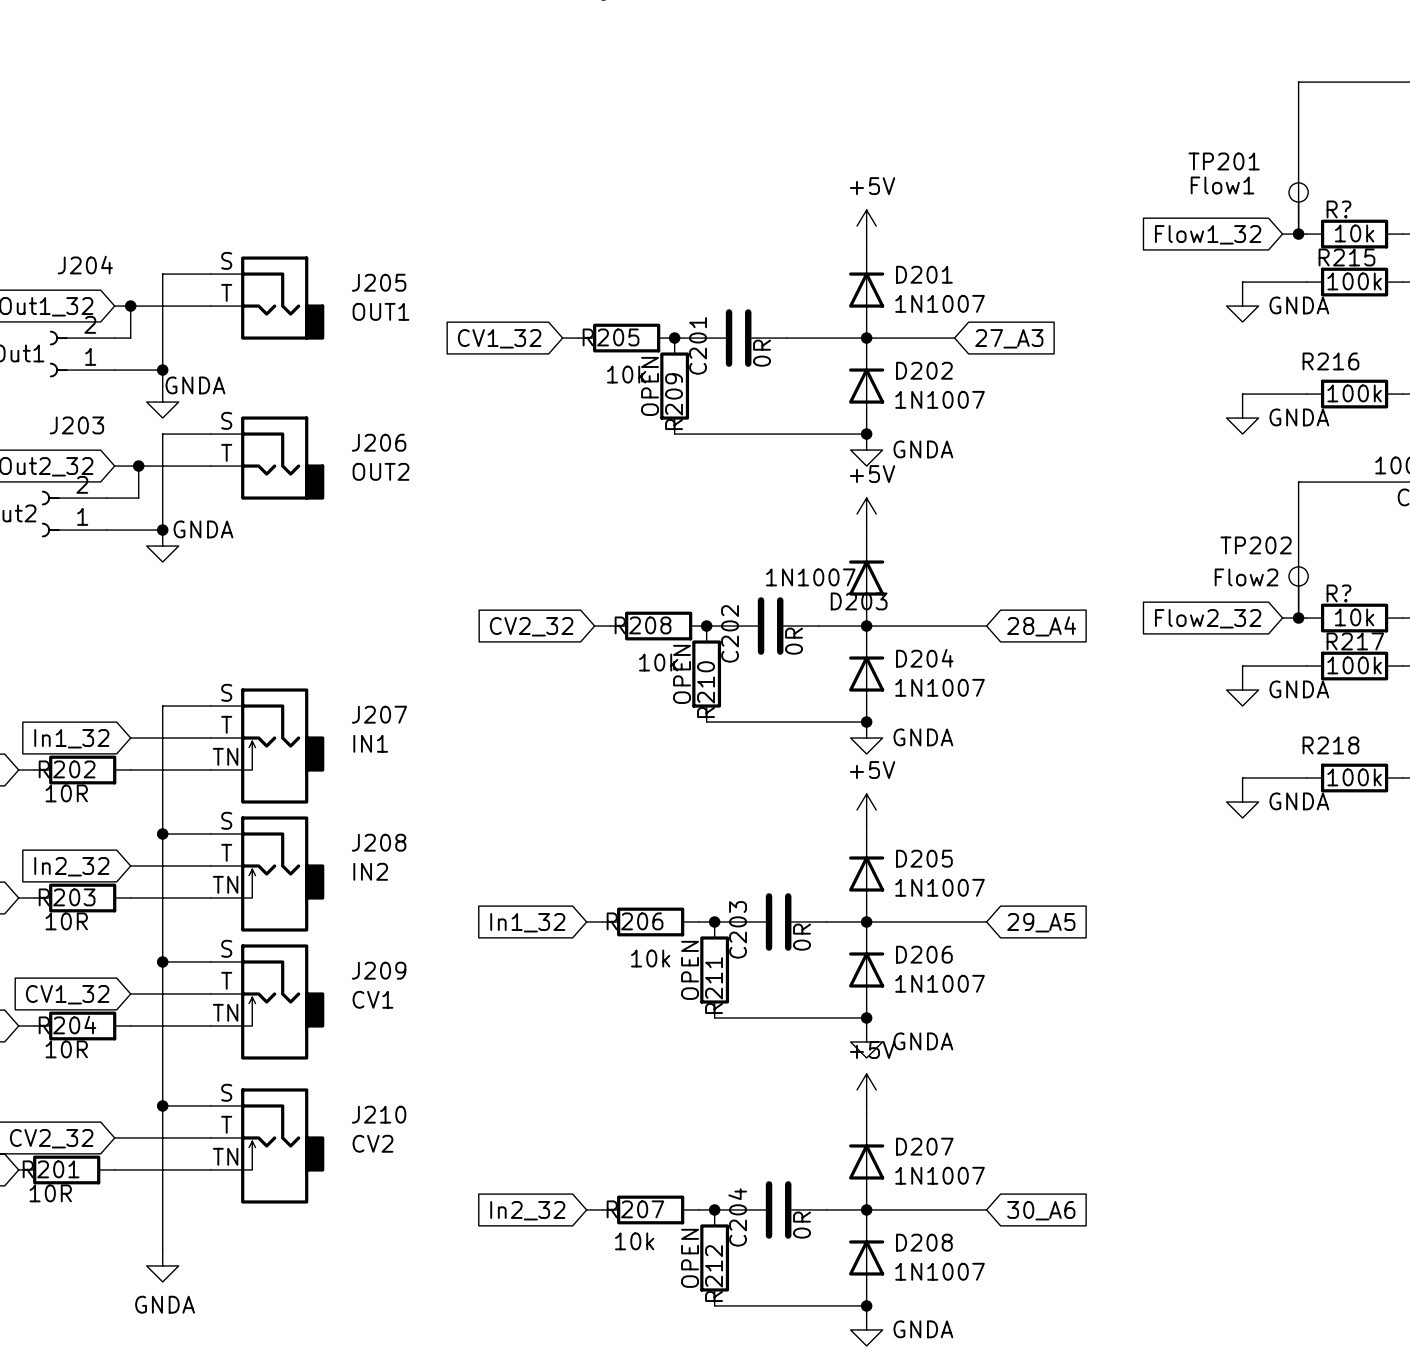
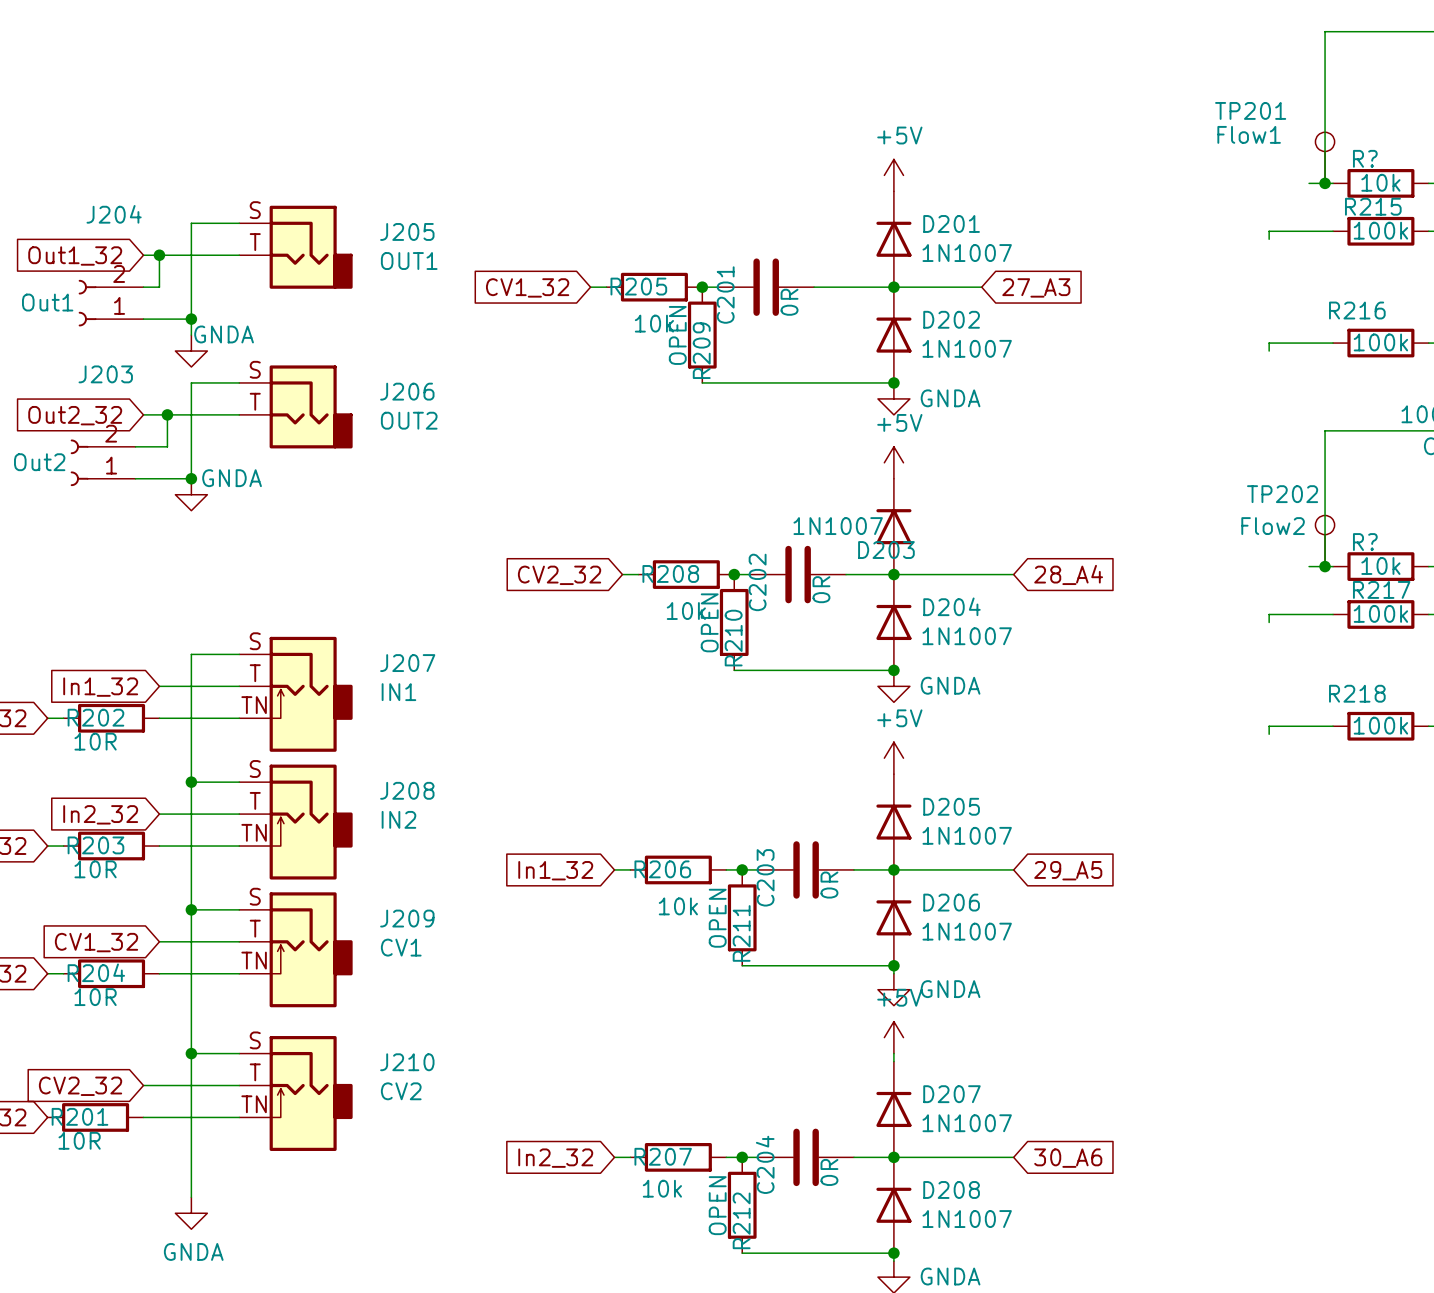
global label: Flow1_32 (1208, 234) -> none
power symbol: GNDA (1242, 306) -> none
power symbol: GNDA (1242, 418) -> none
global label: Flow2_32 (1208, 618) -> none
power symbol: GNDA (1242, 690) -> none
power symbol: GNDA (1242, 802) -> none

